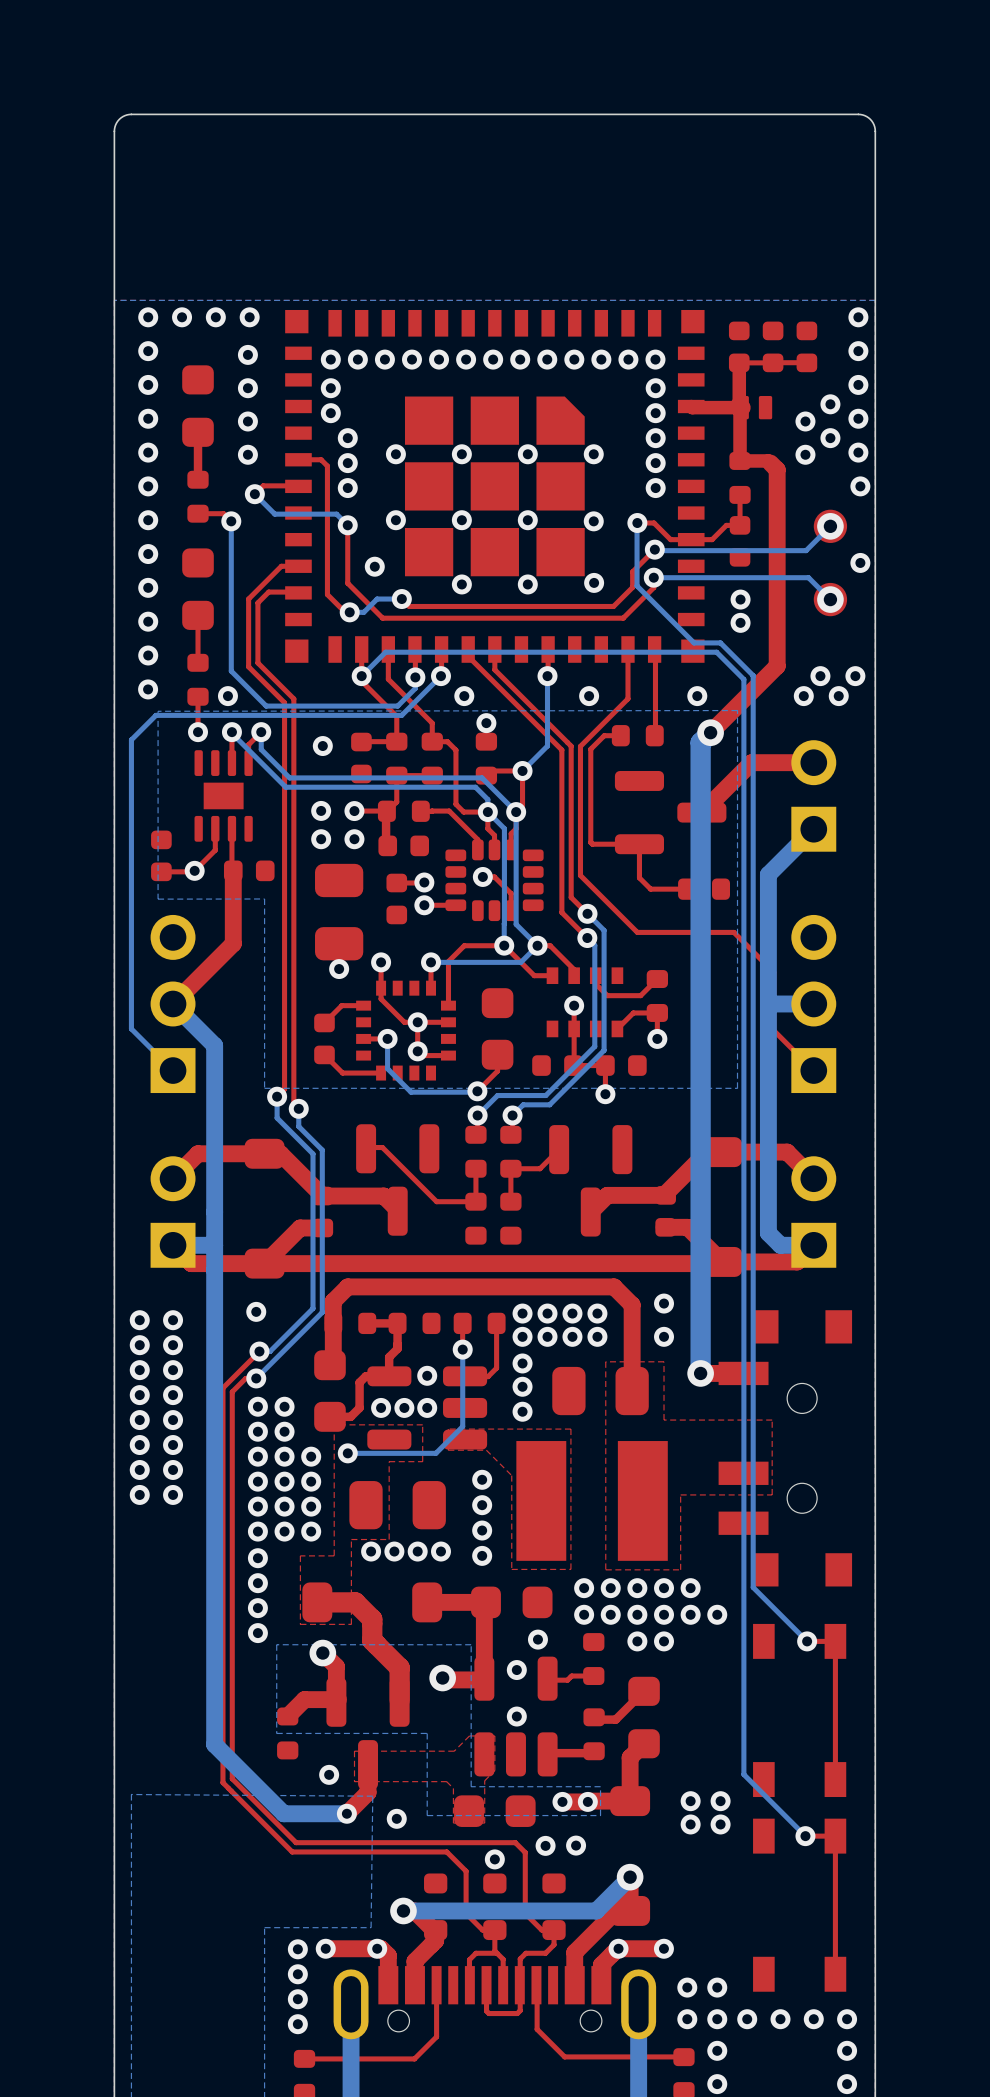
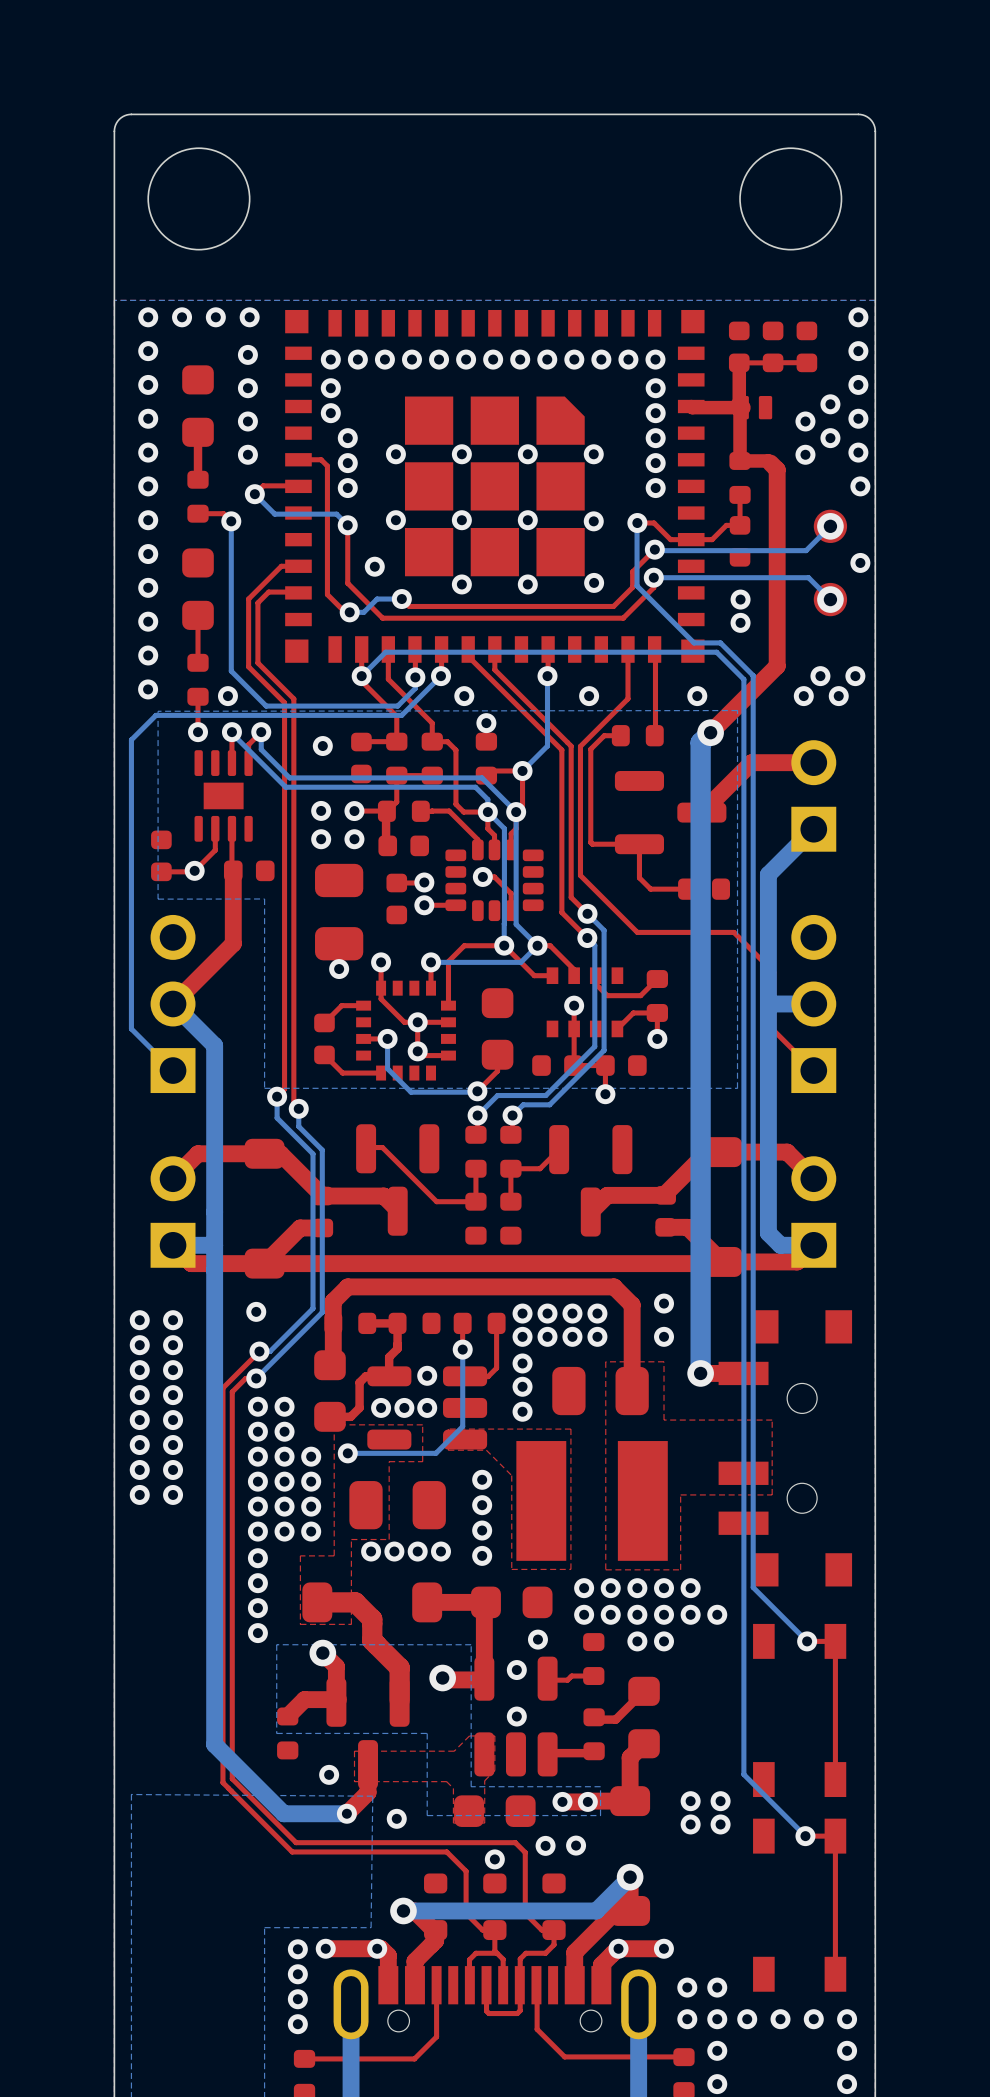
round board edge: none -> [147, 147, 251, 251]
round board edge: none -> [739, 147, 843, 251]

